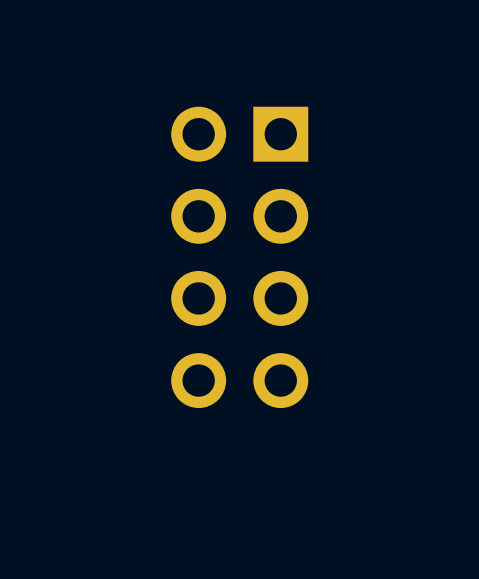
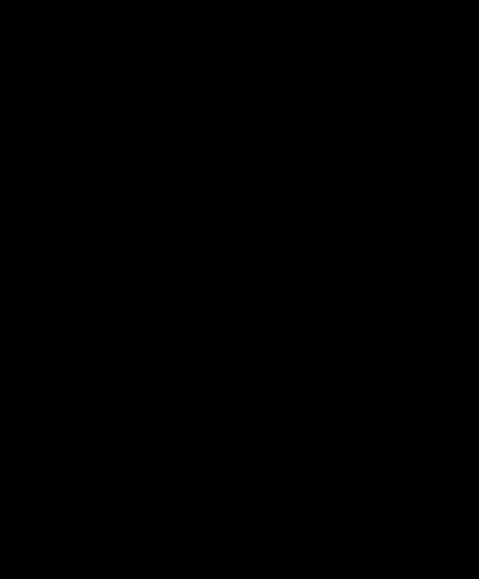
part: (239, 257) -> none

